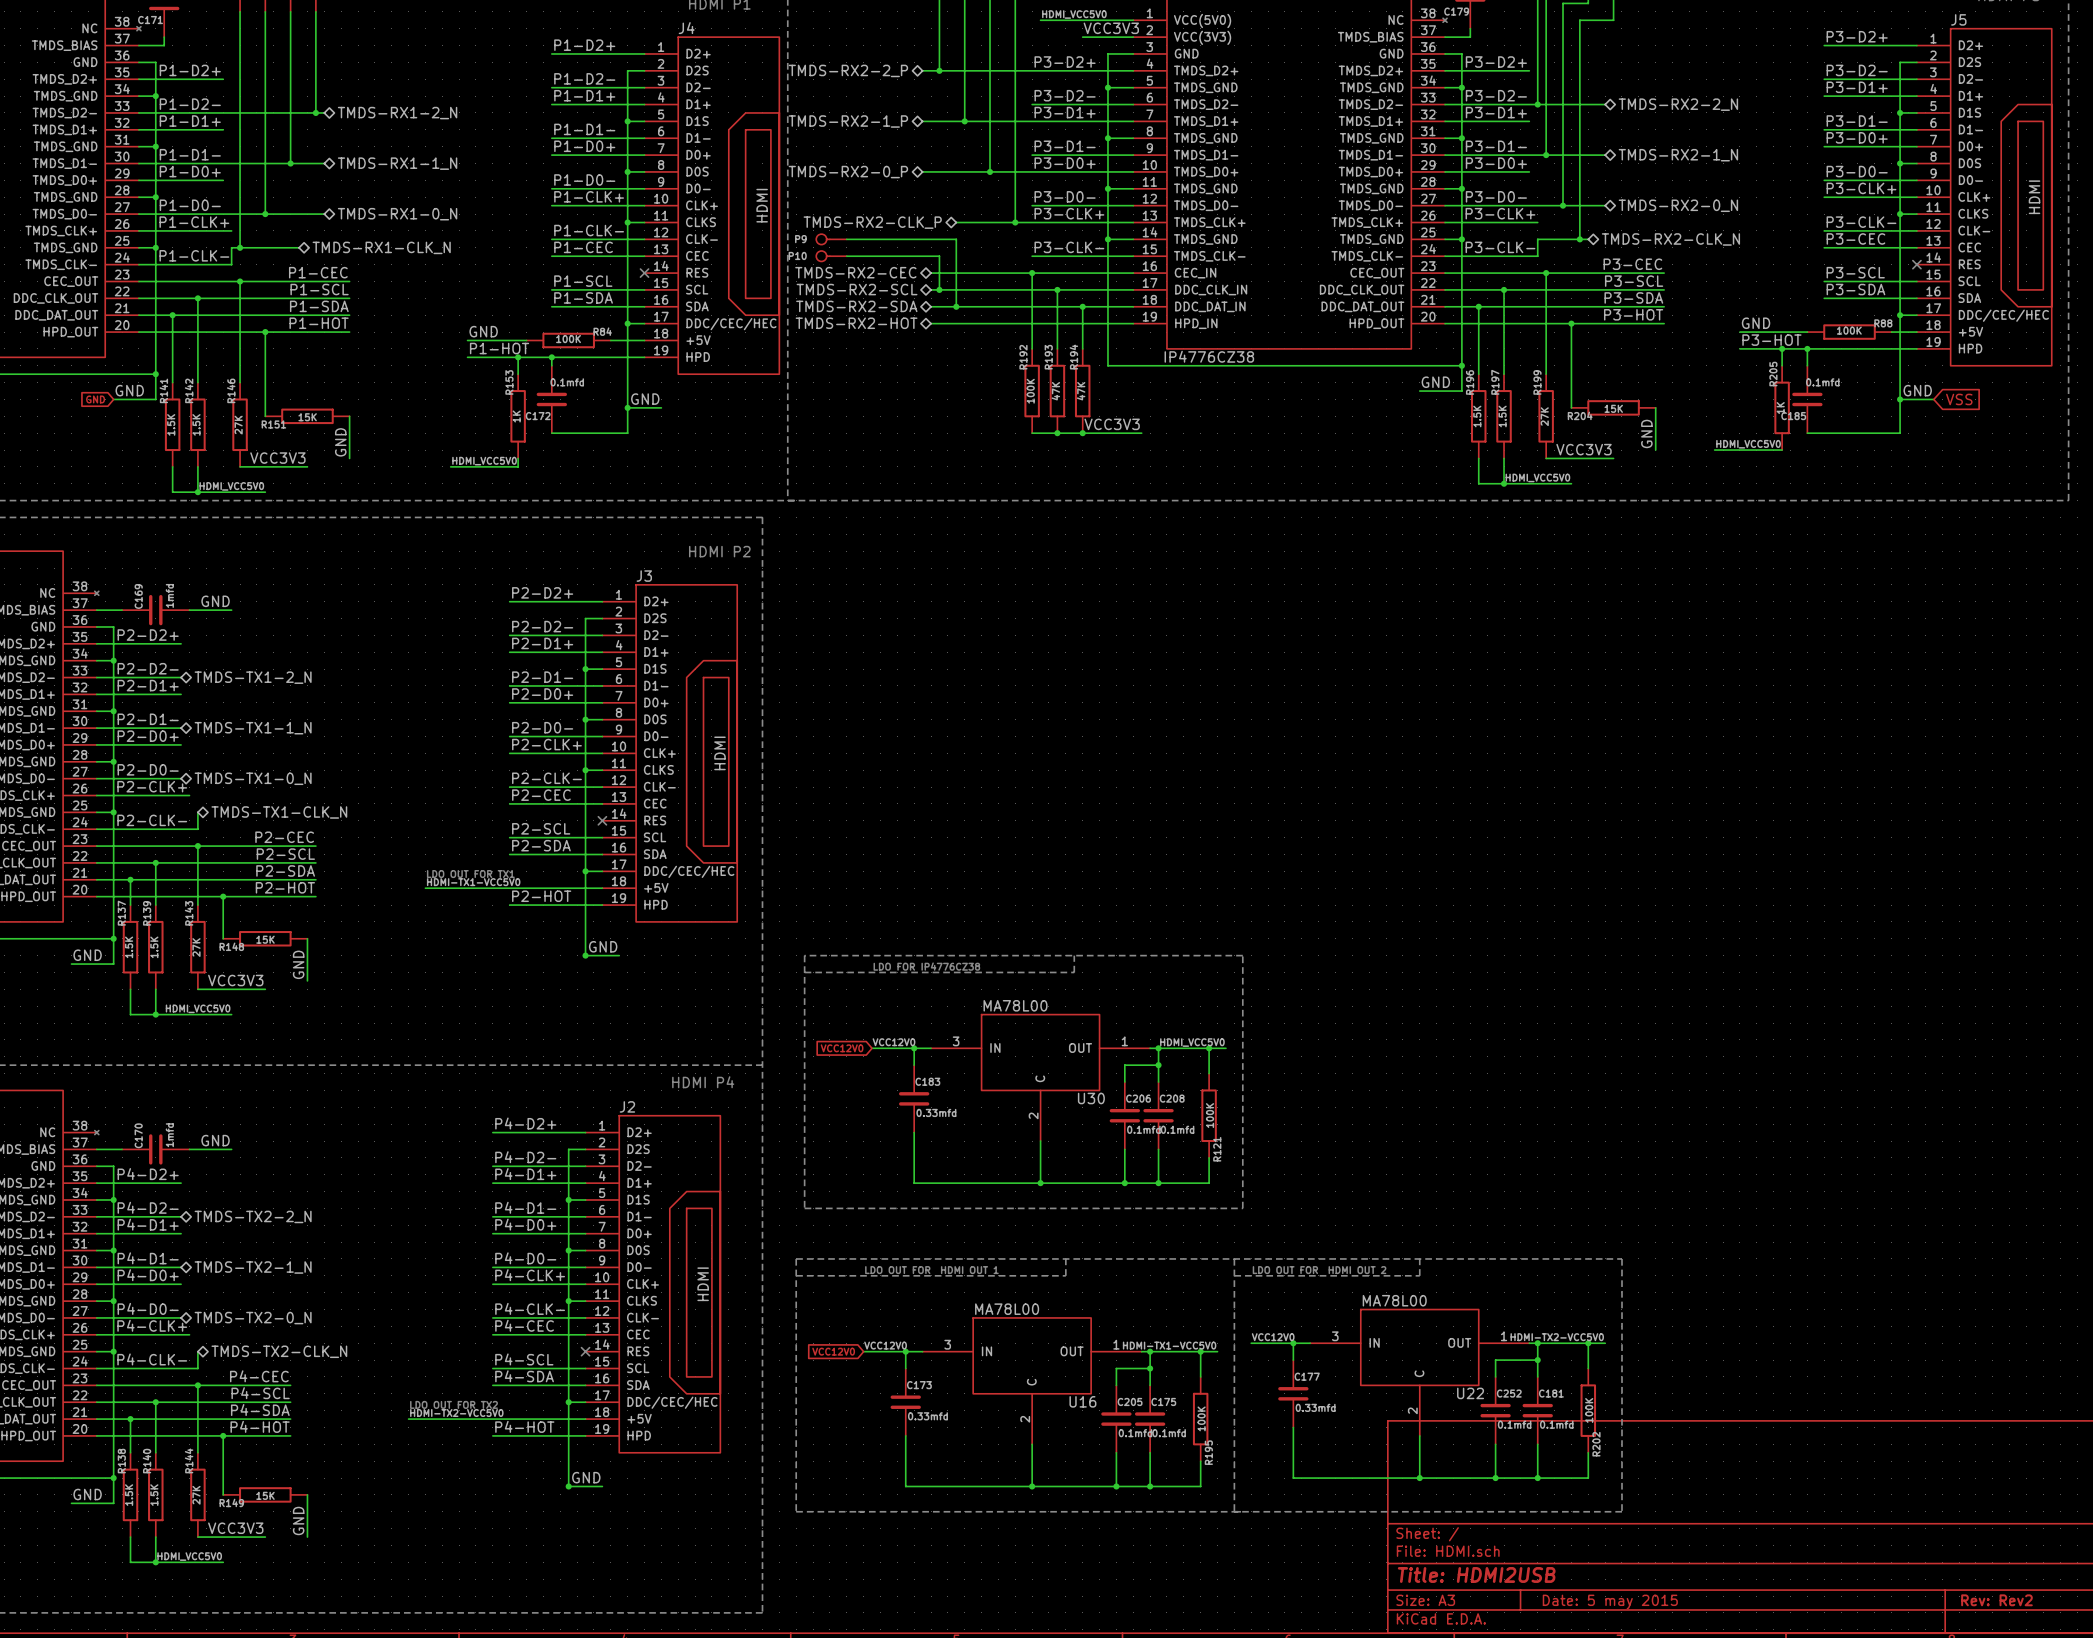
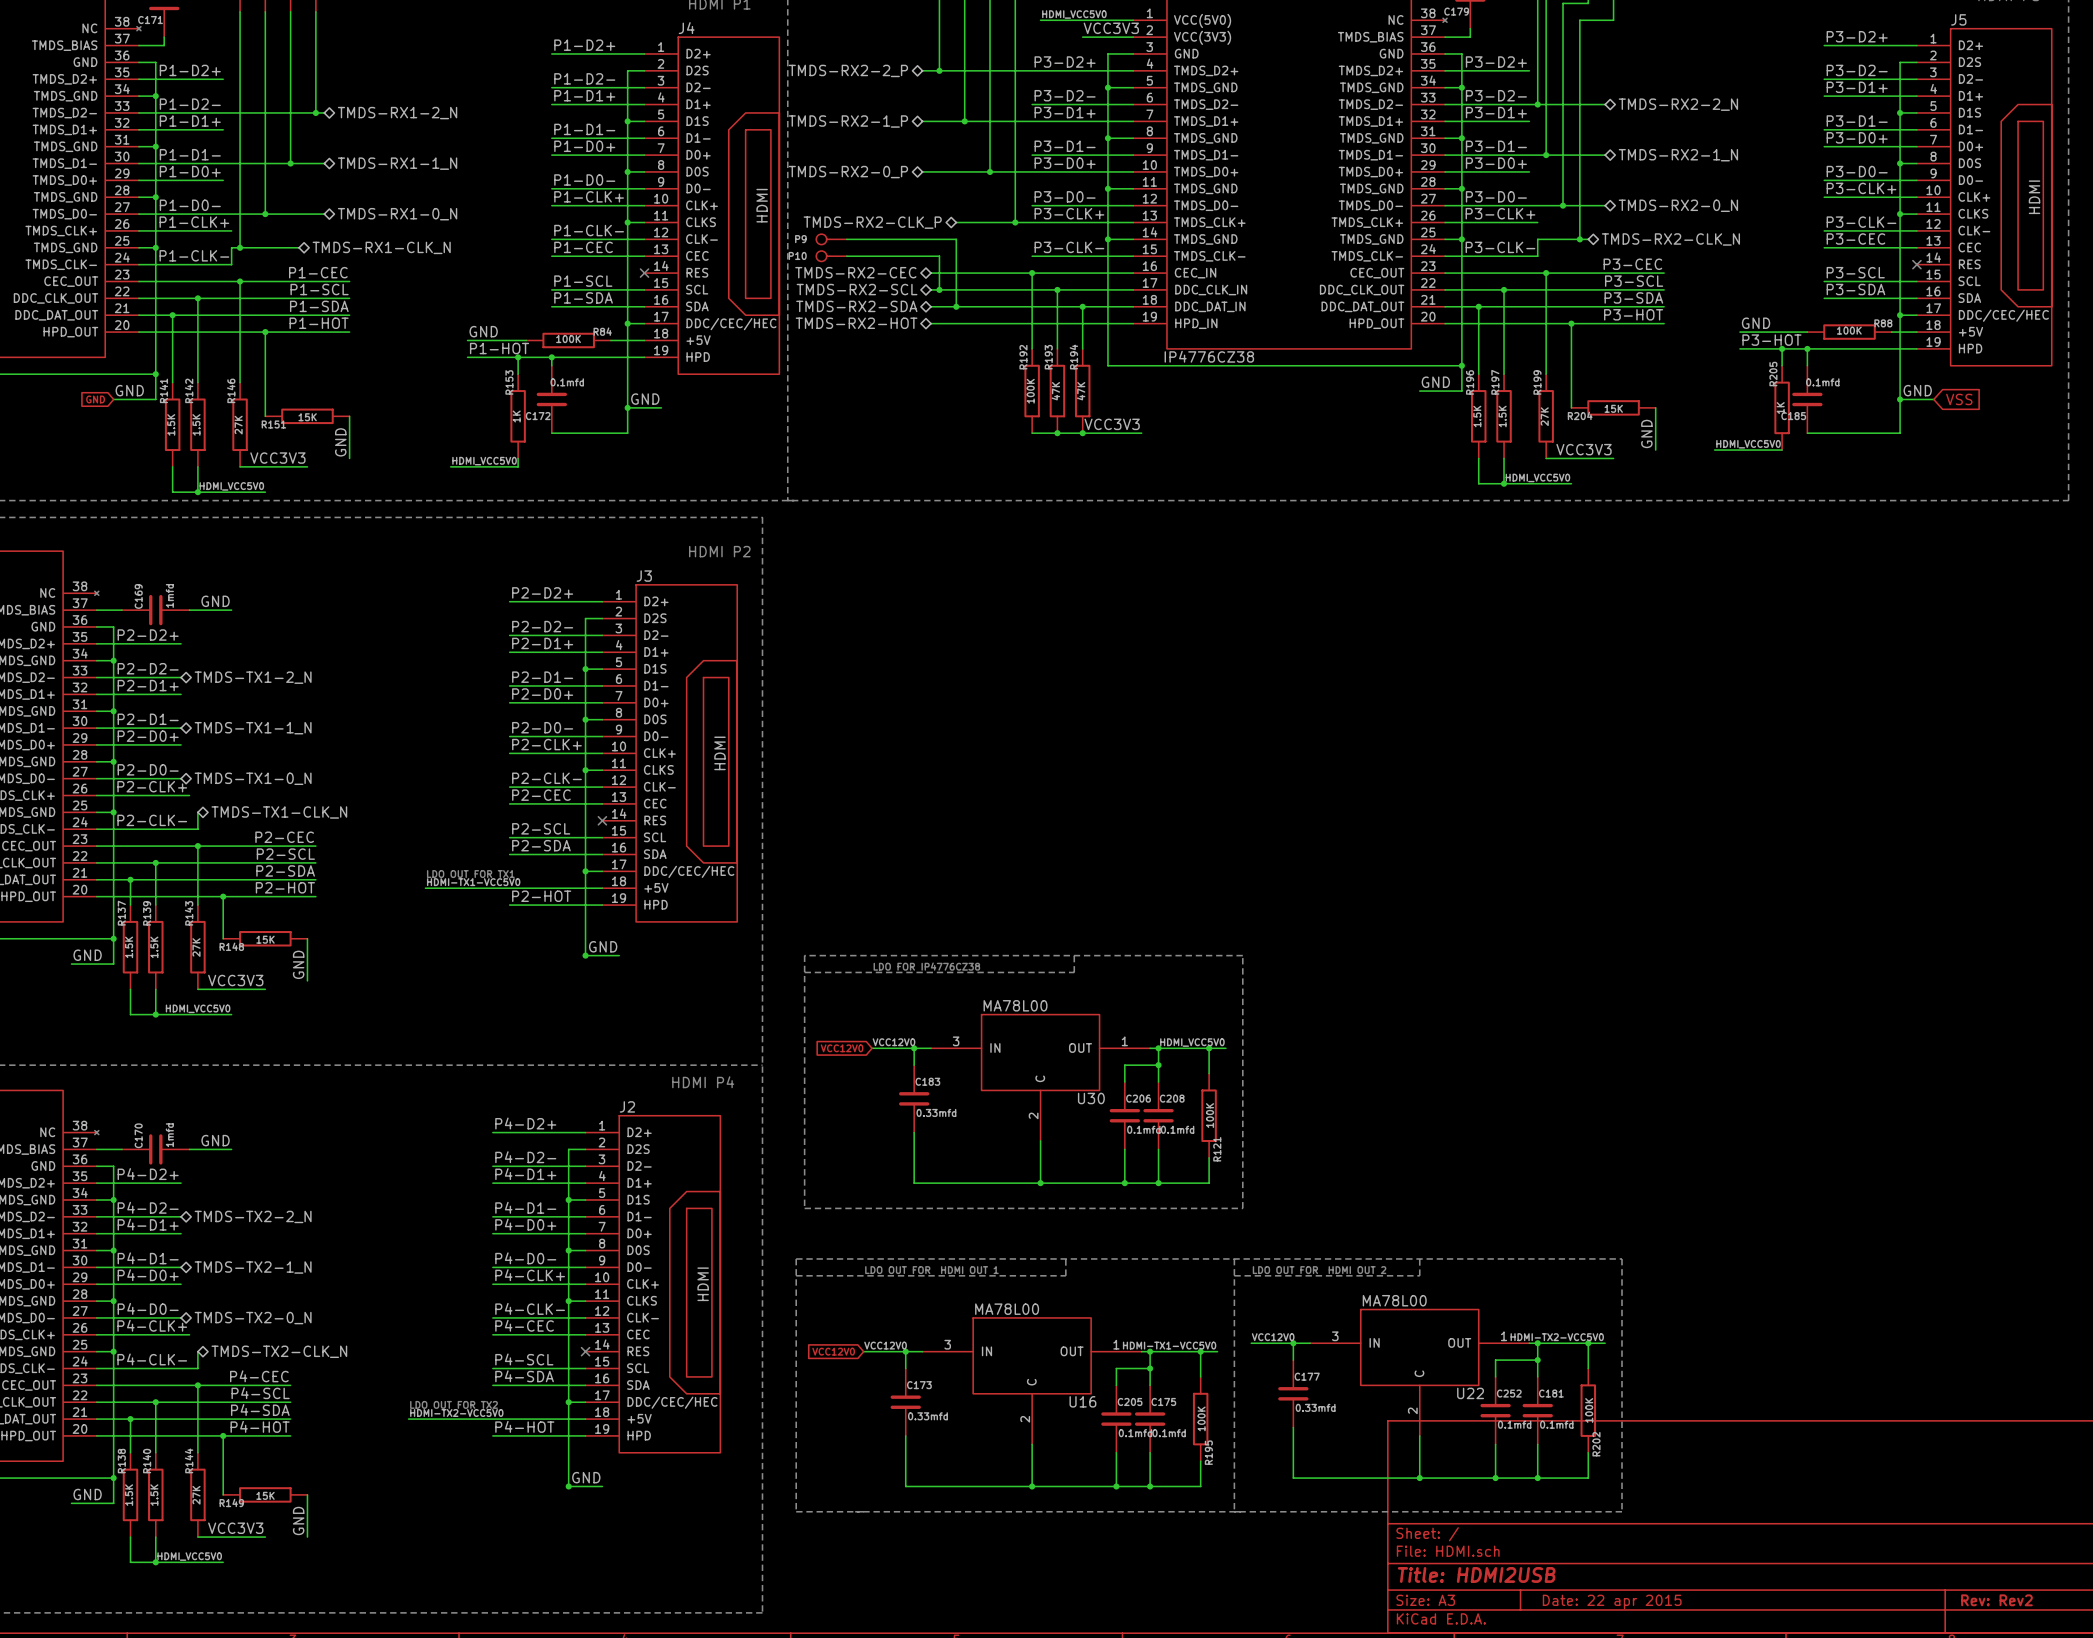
title block: Date: 5 may 2015 (1610, 1601) -> Date: 22 apr 2015 (1612, 1601)

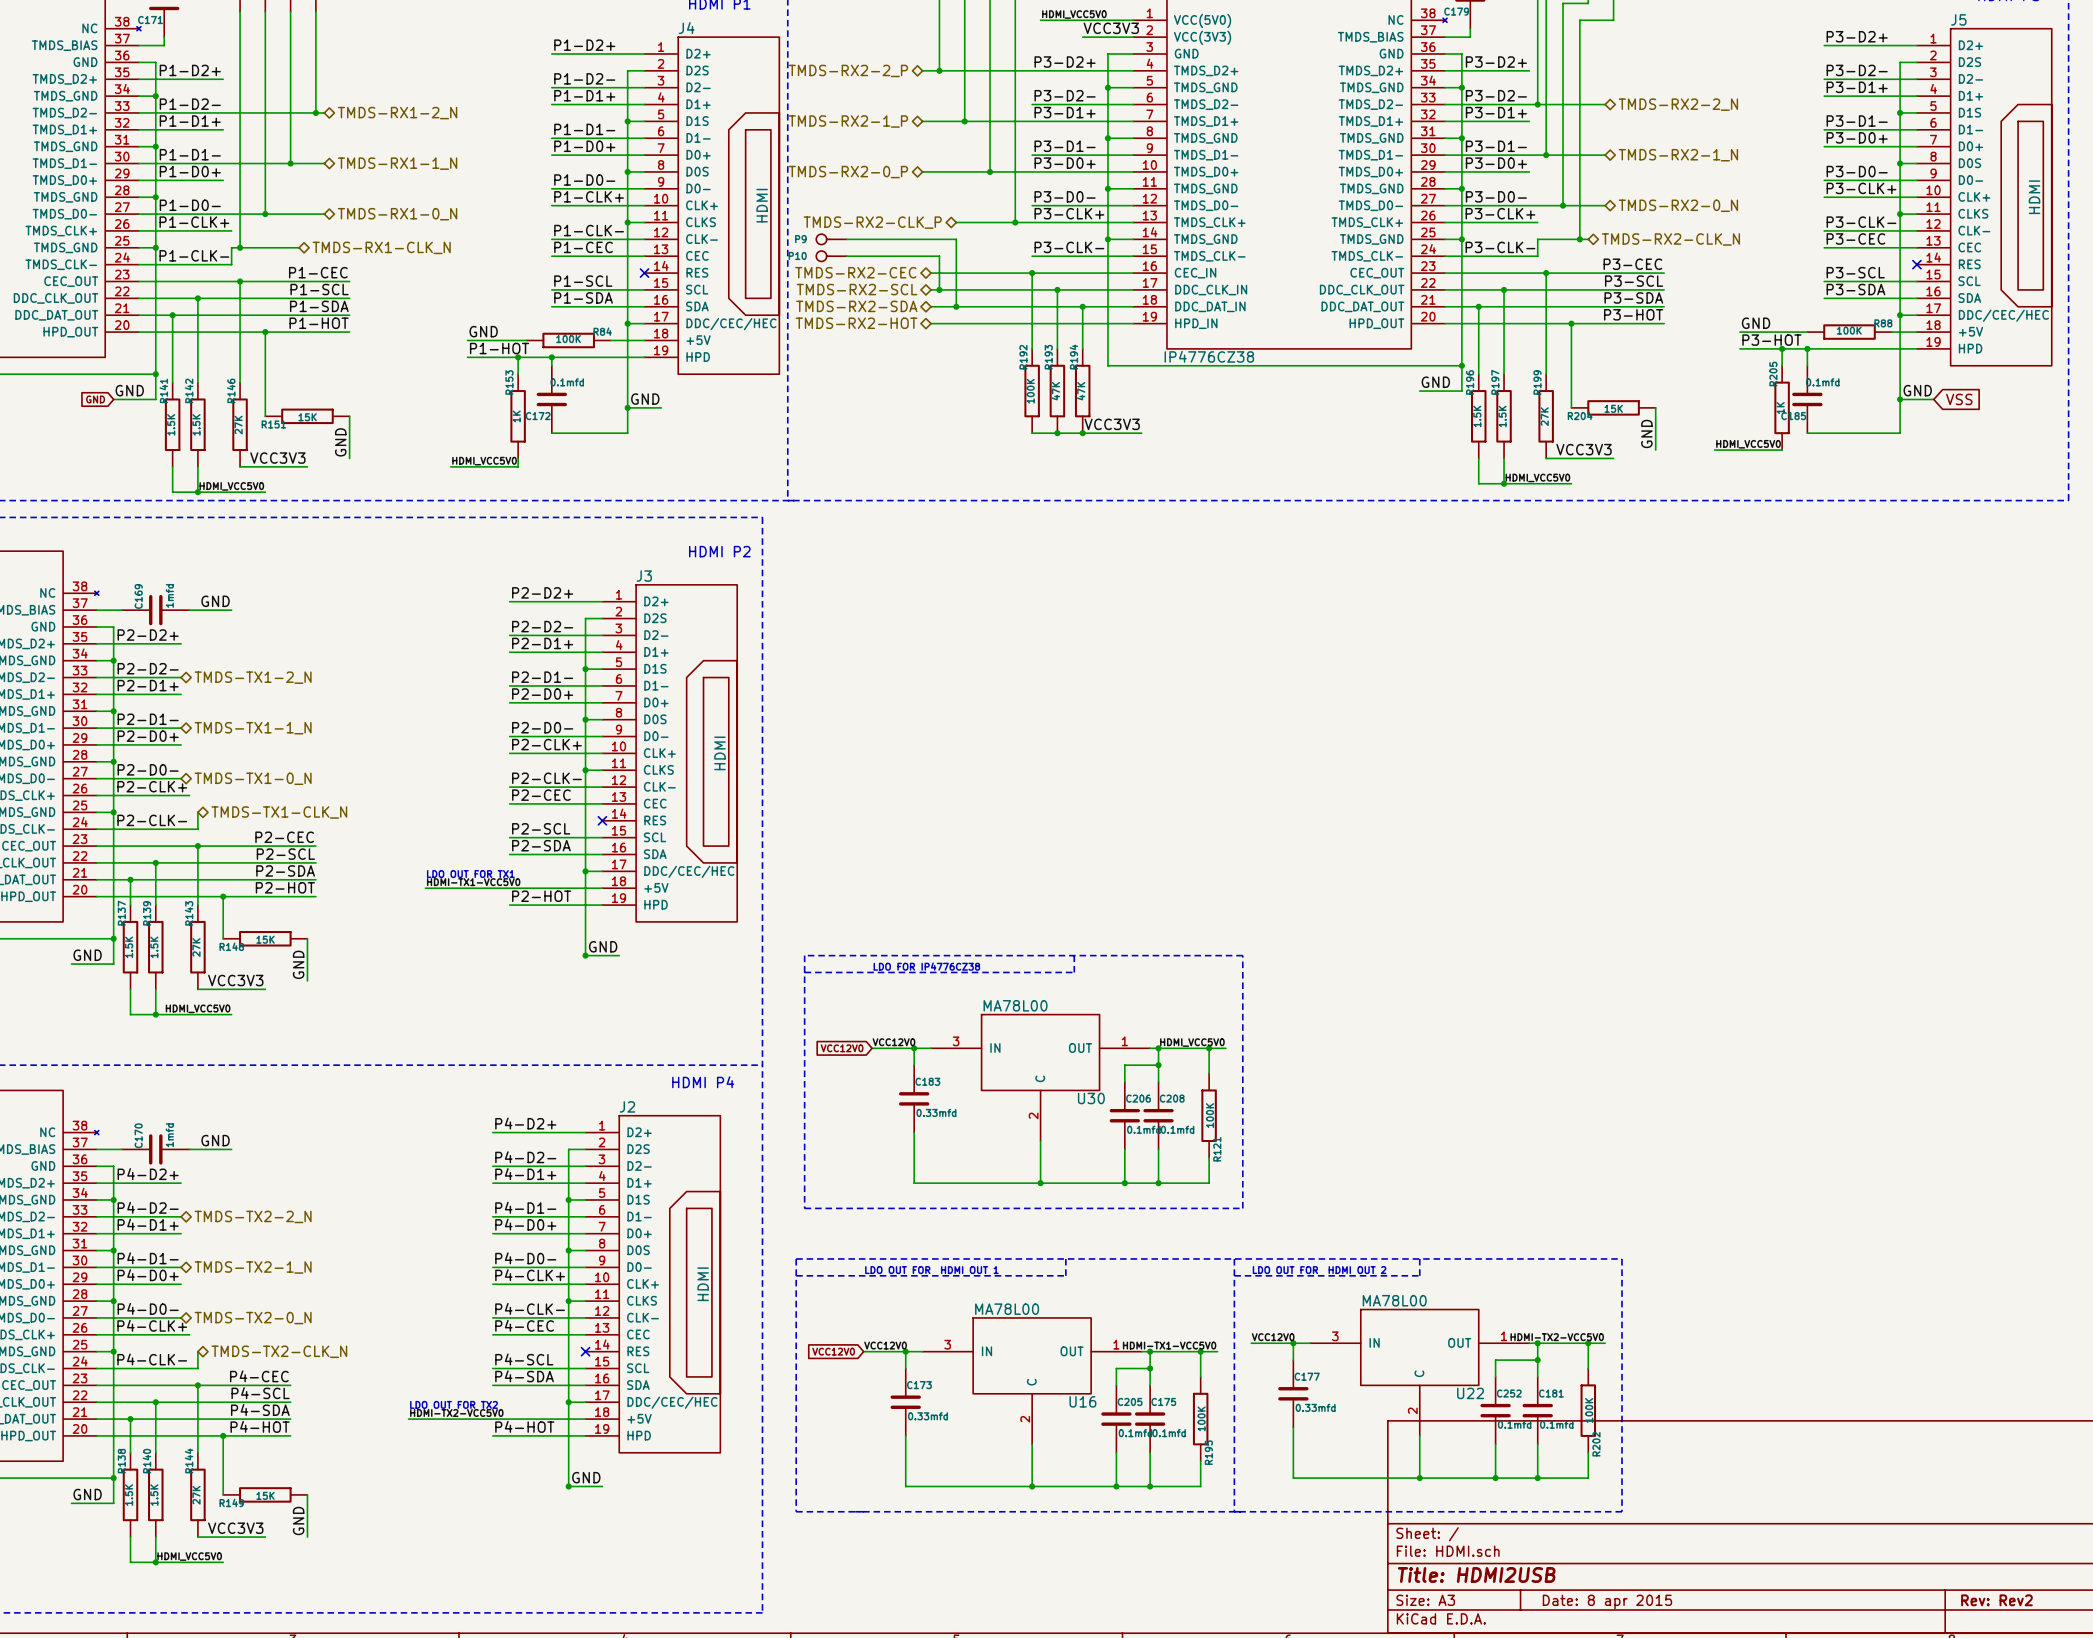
title block: Date: 22 apr 2015 (1612, 1601) -> Date: 8 apr 2015 (1607, 1601)

